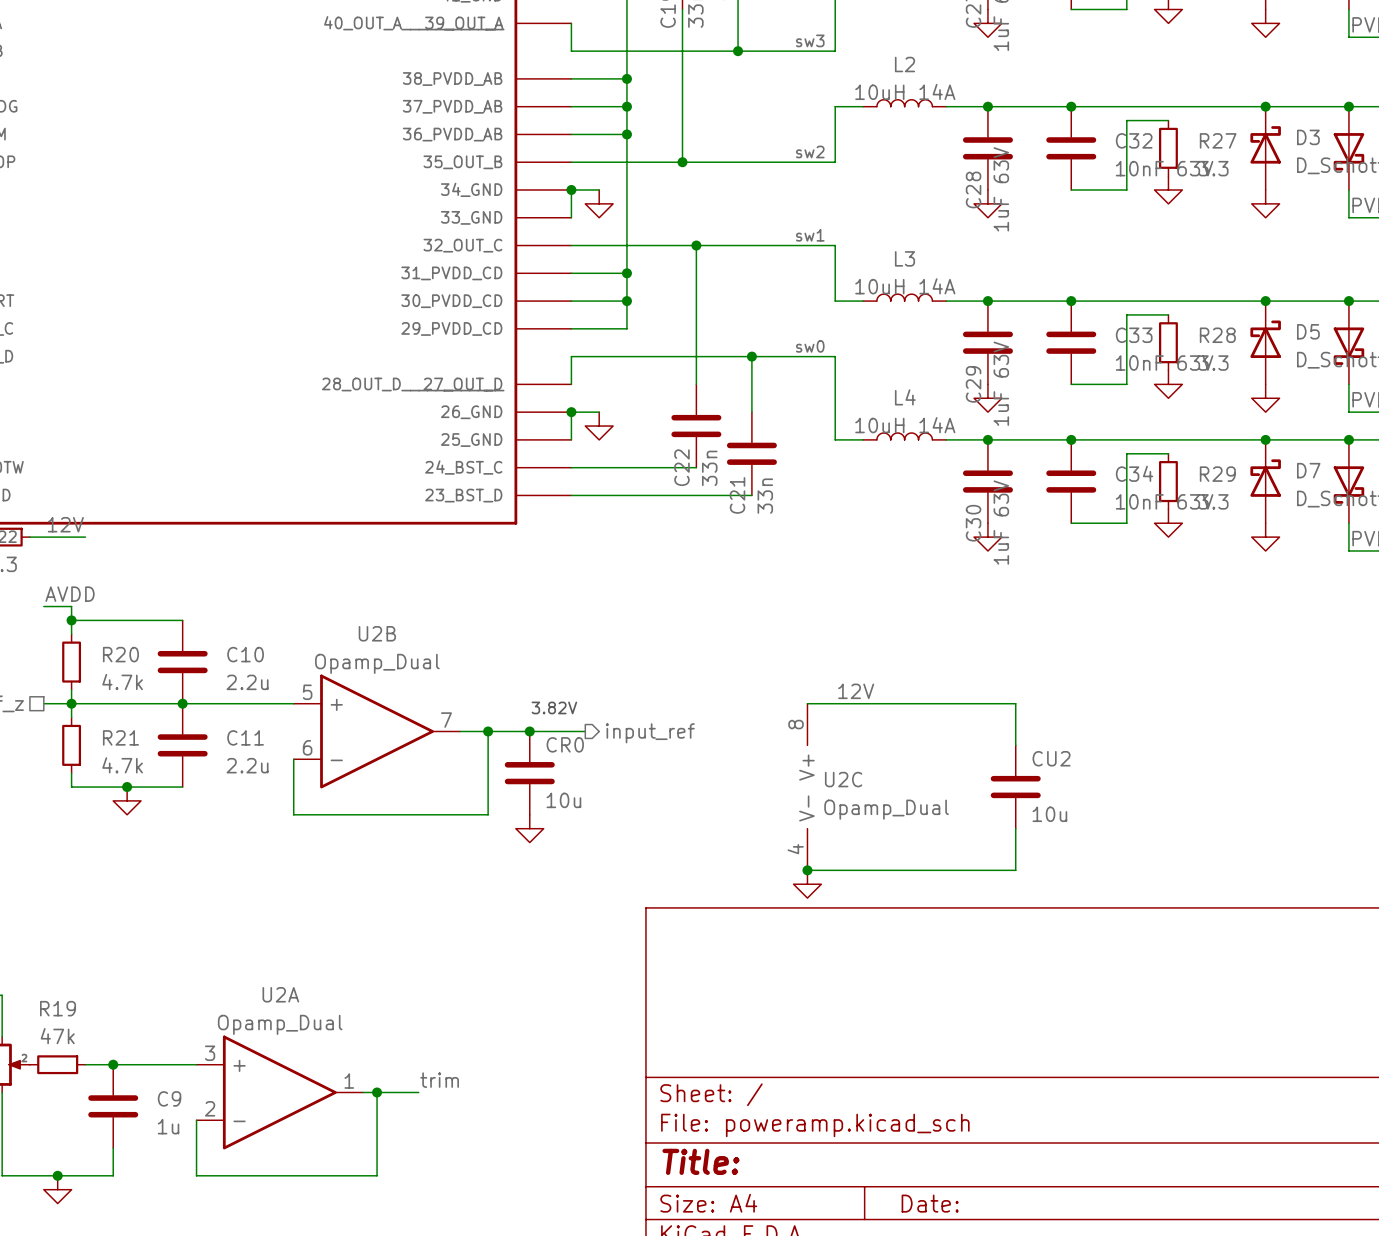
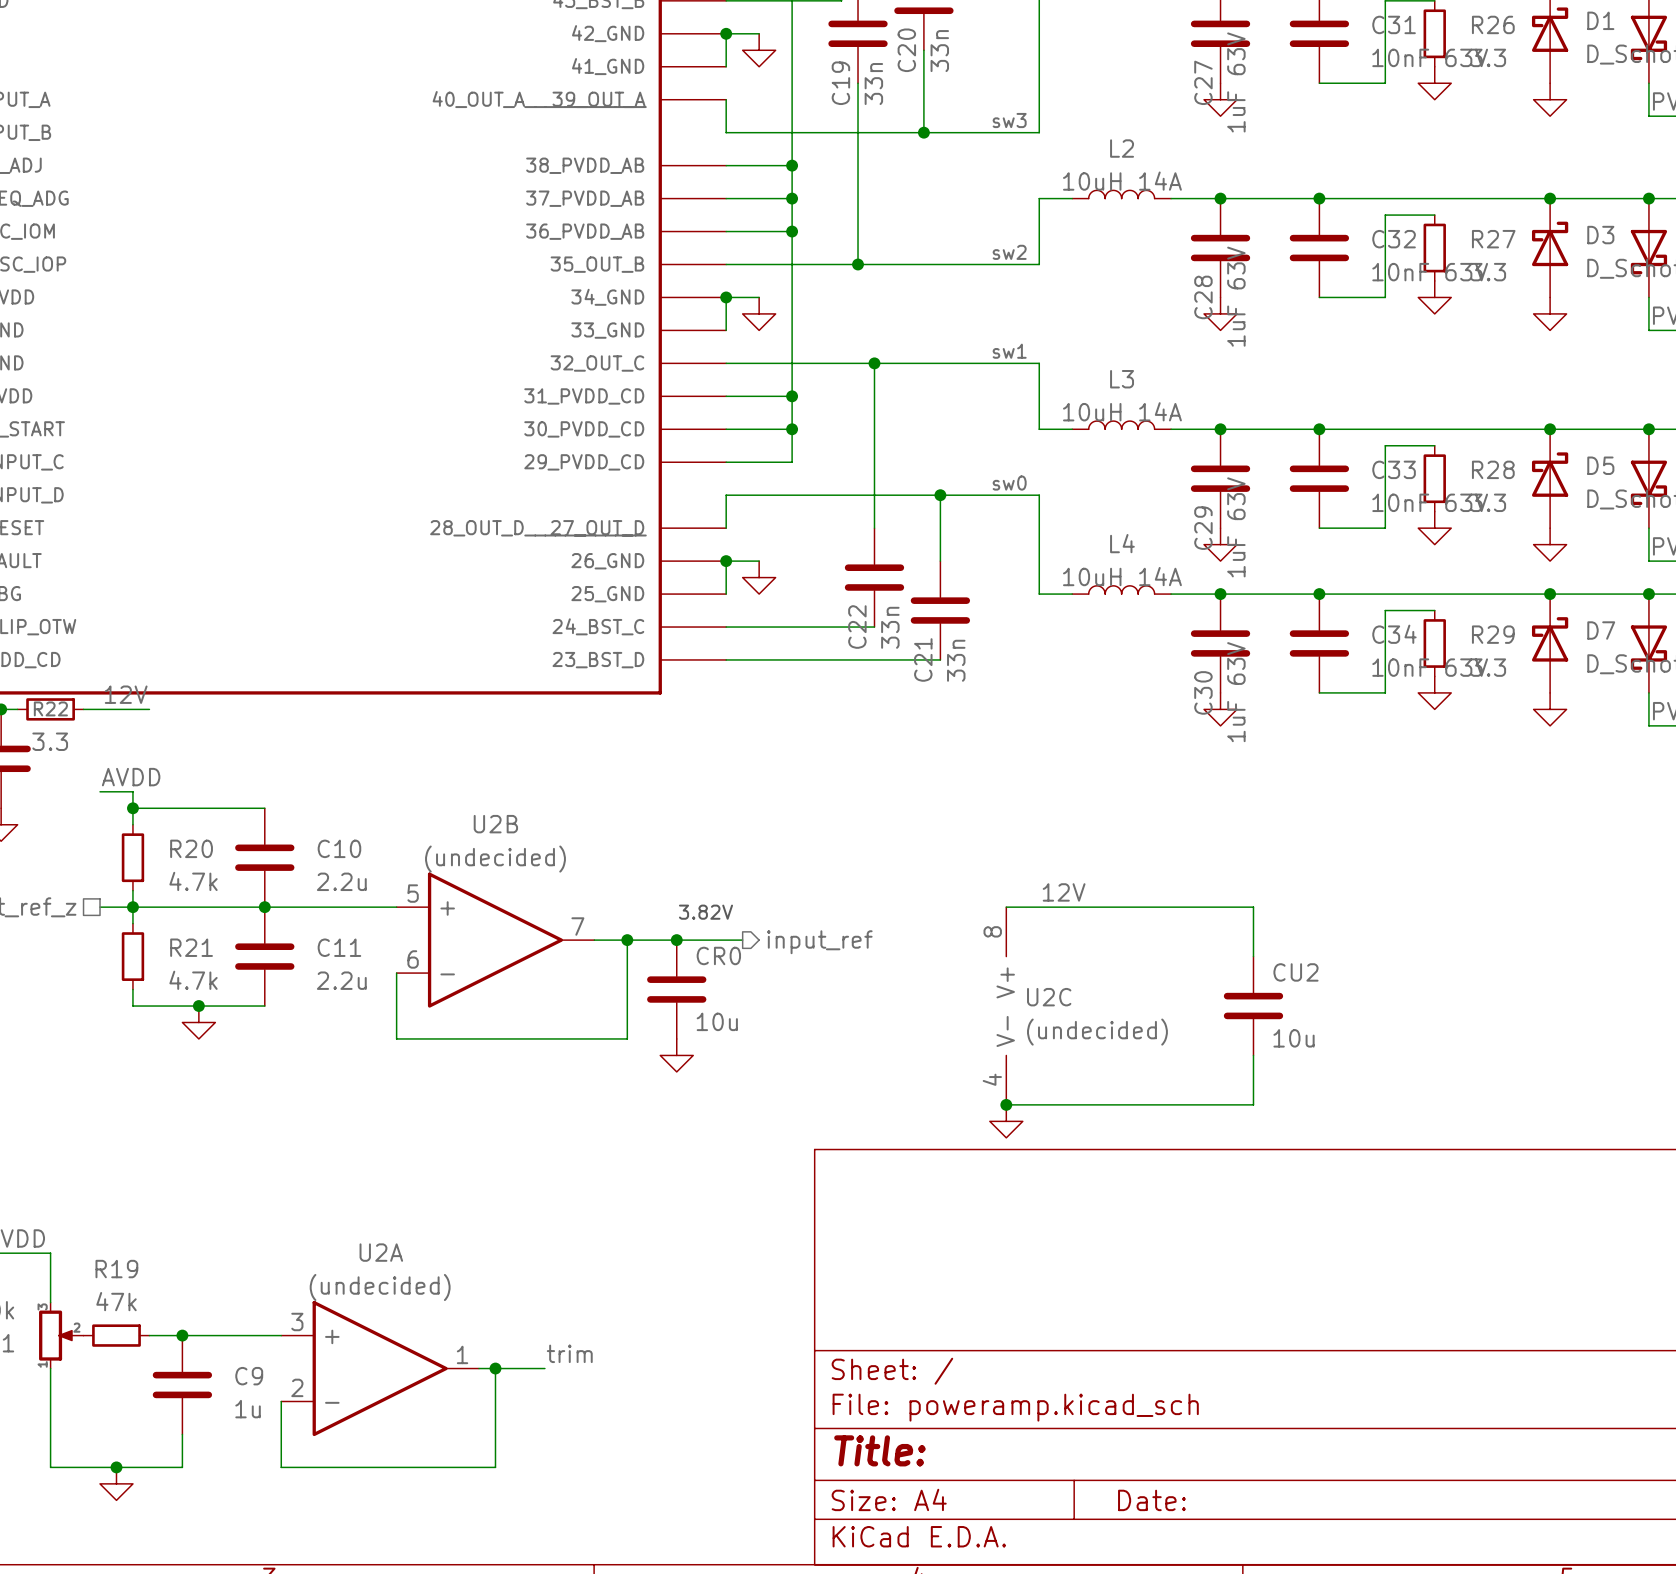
U2B value: Opamp_Dual (377, 663) -> (undecided) (495, 859)
U2C value: Opamp_Dual (886, 809) -> (undecided) (1097, 1032)
U2A value: Opamp_Dual (280, 1024) -> (undecided) (380, 1287)

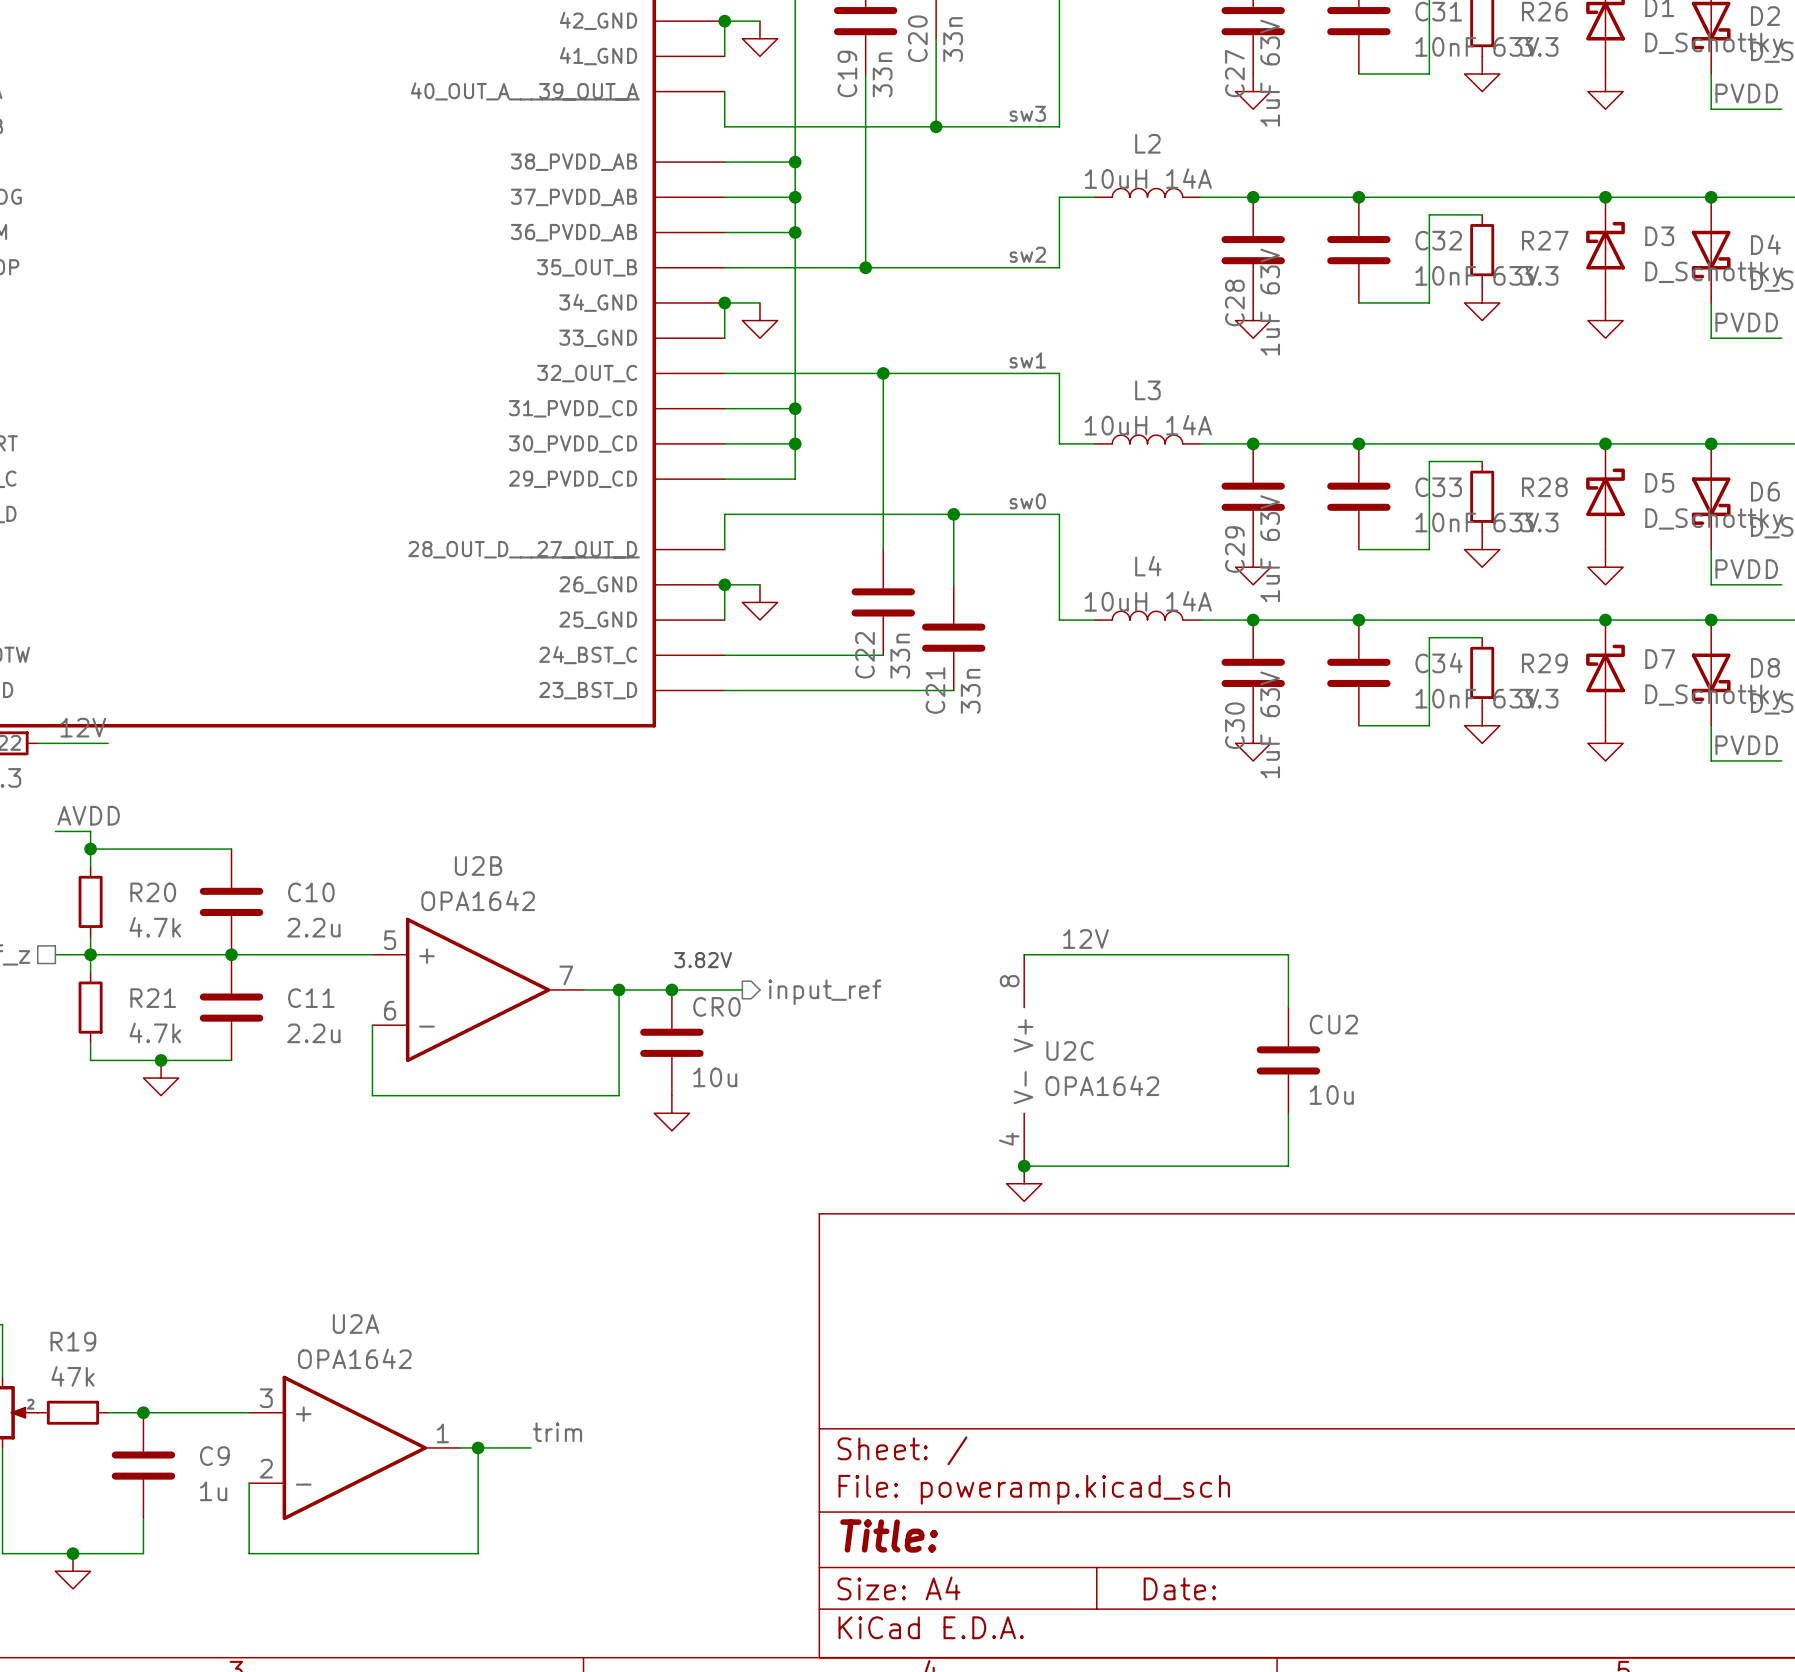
U2B value: (undecided) (495, 859) -> OPA1642 (478, 900)
U2C value: (undecided) (1097, 1032) -> OPA1642 (1102, 1085)
U2A value: (undecided) (380, 1287) -> OPA1642 (354, 1358)

